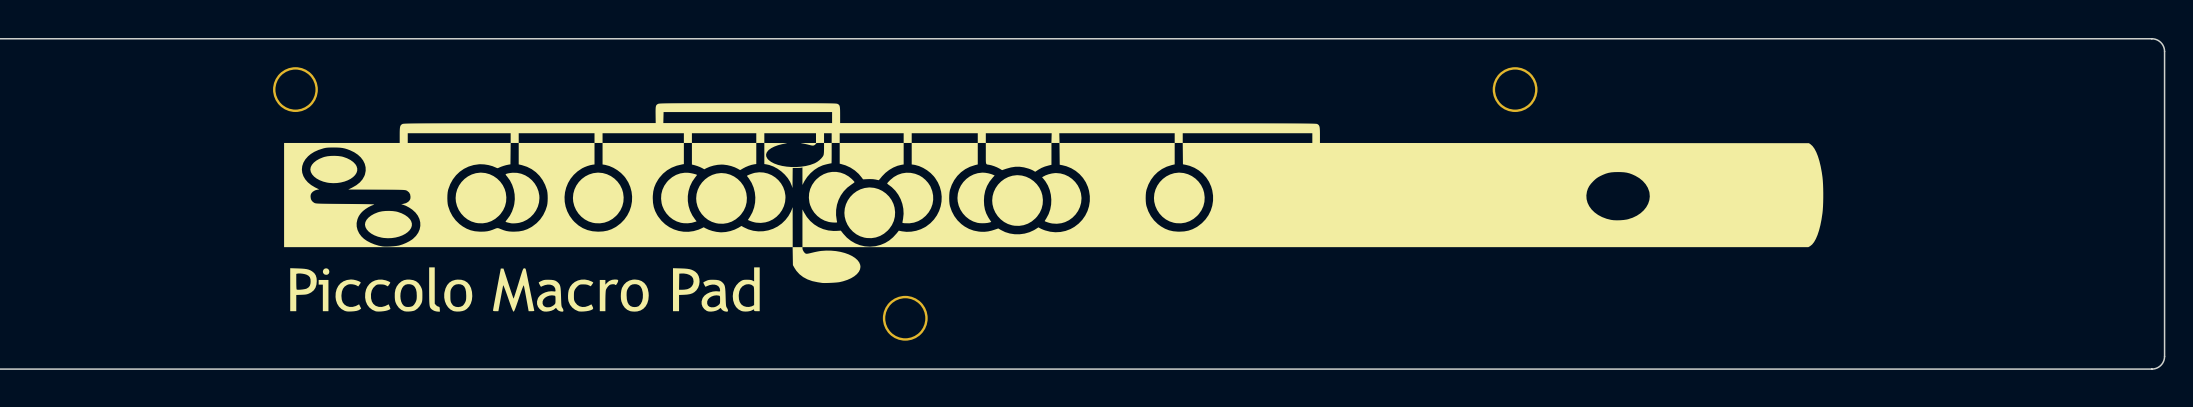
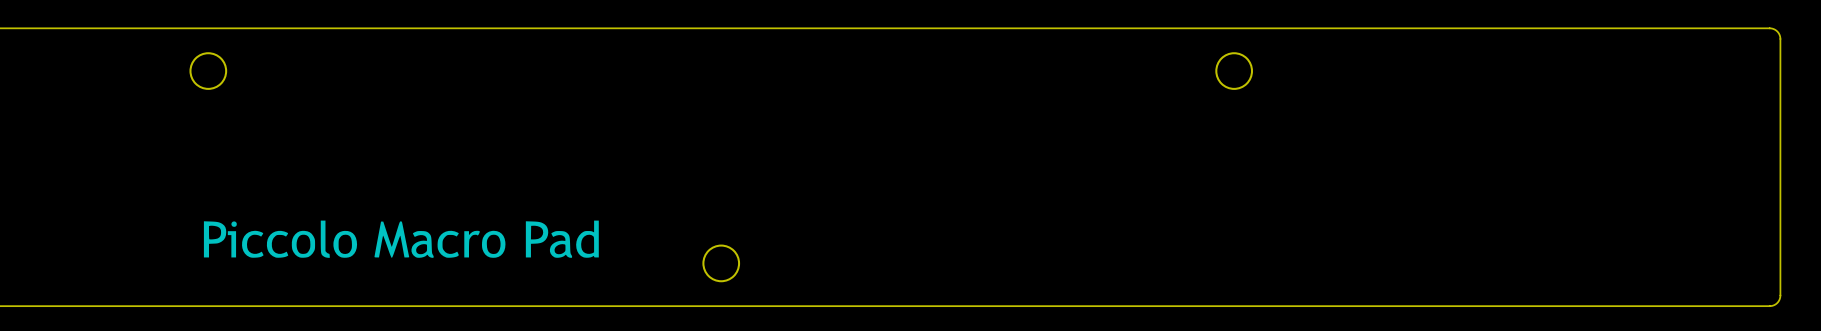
drawing: [284, 103, 1824, 284] -> none

